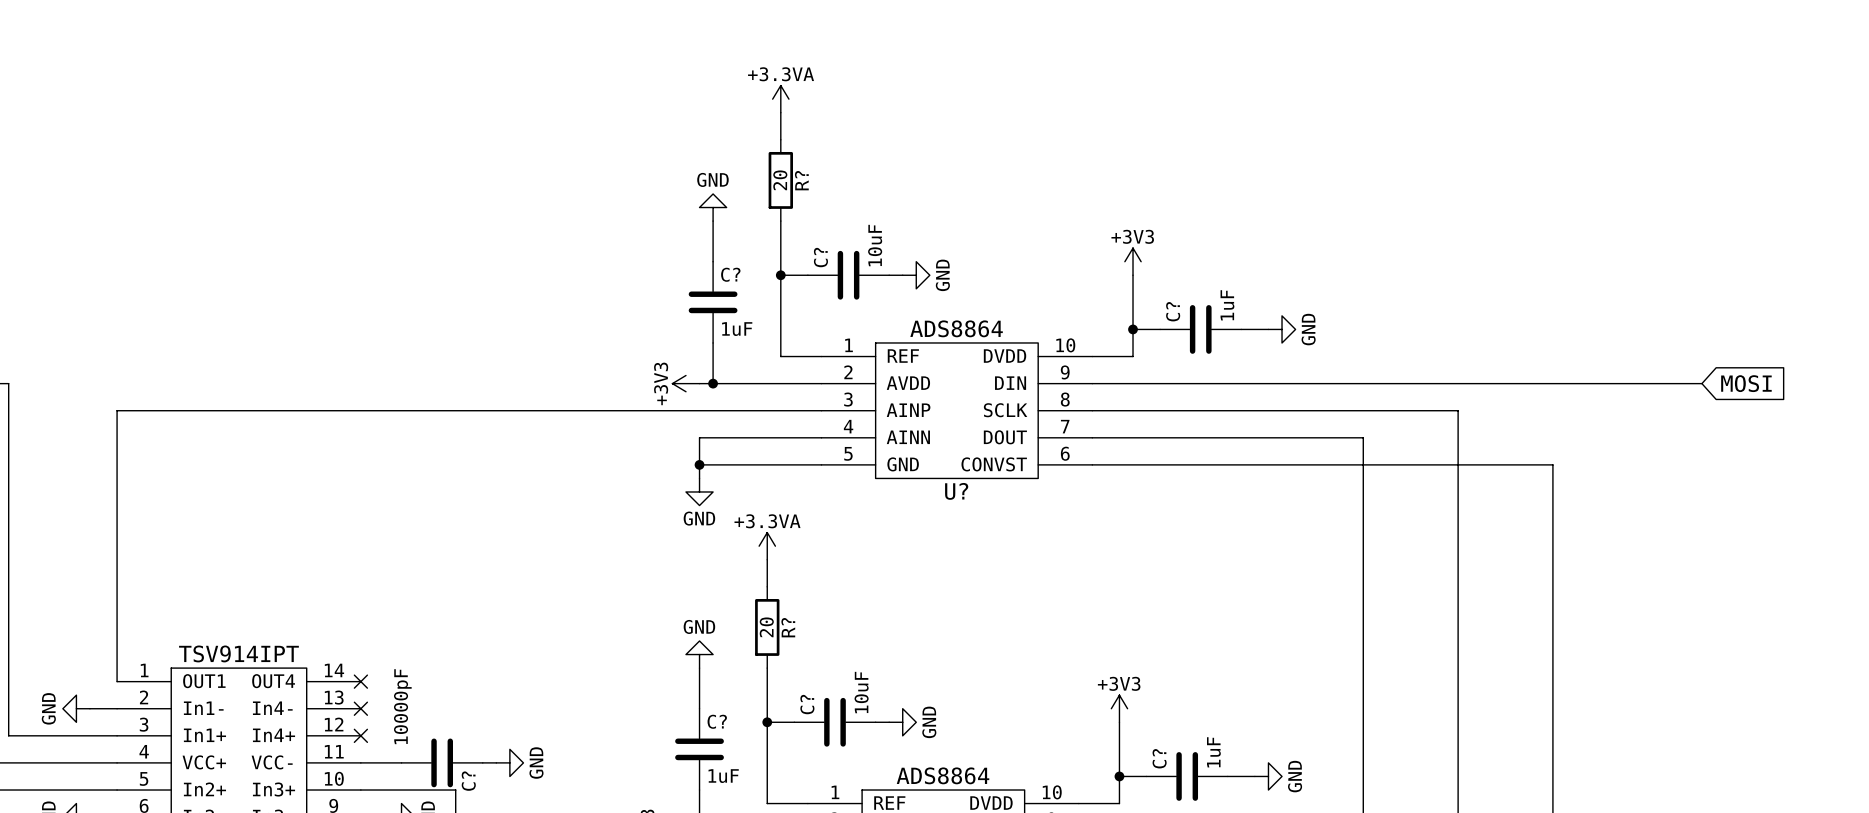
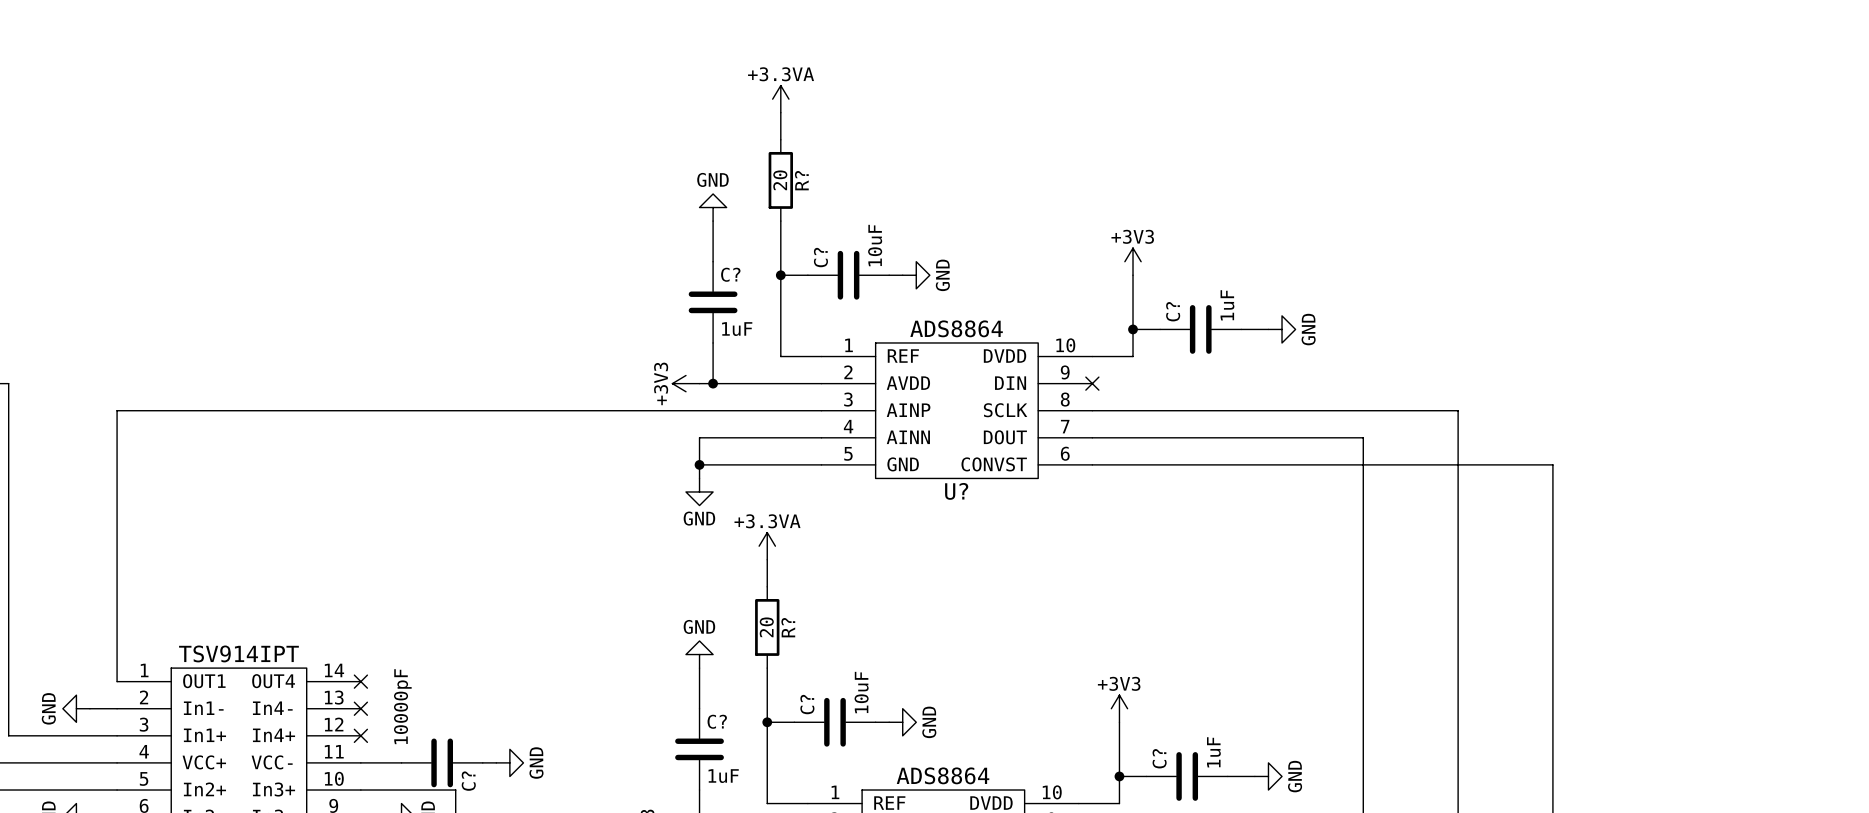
wire: (1092, 383) (1701, 383) -> none
no-connect mark: none -> (1092, 383)
global label: MOSI (1746, 383) -> none

